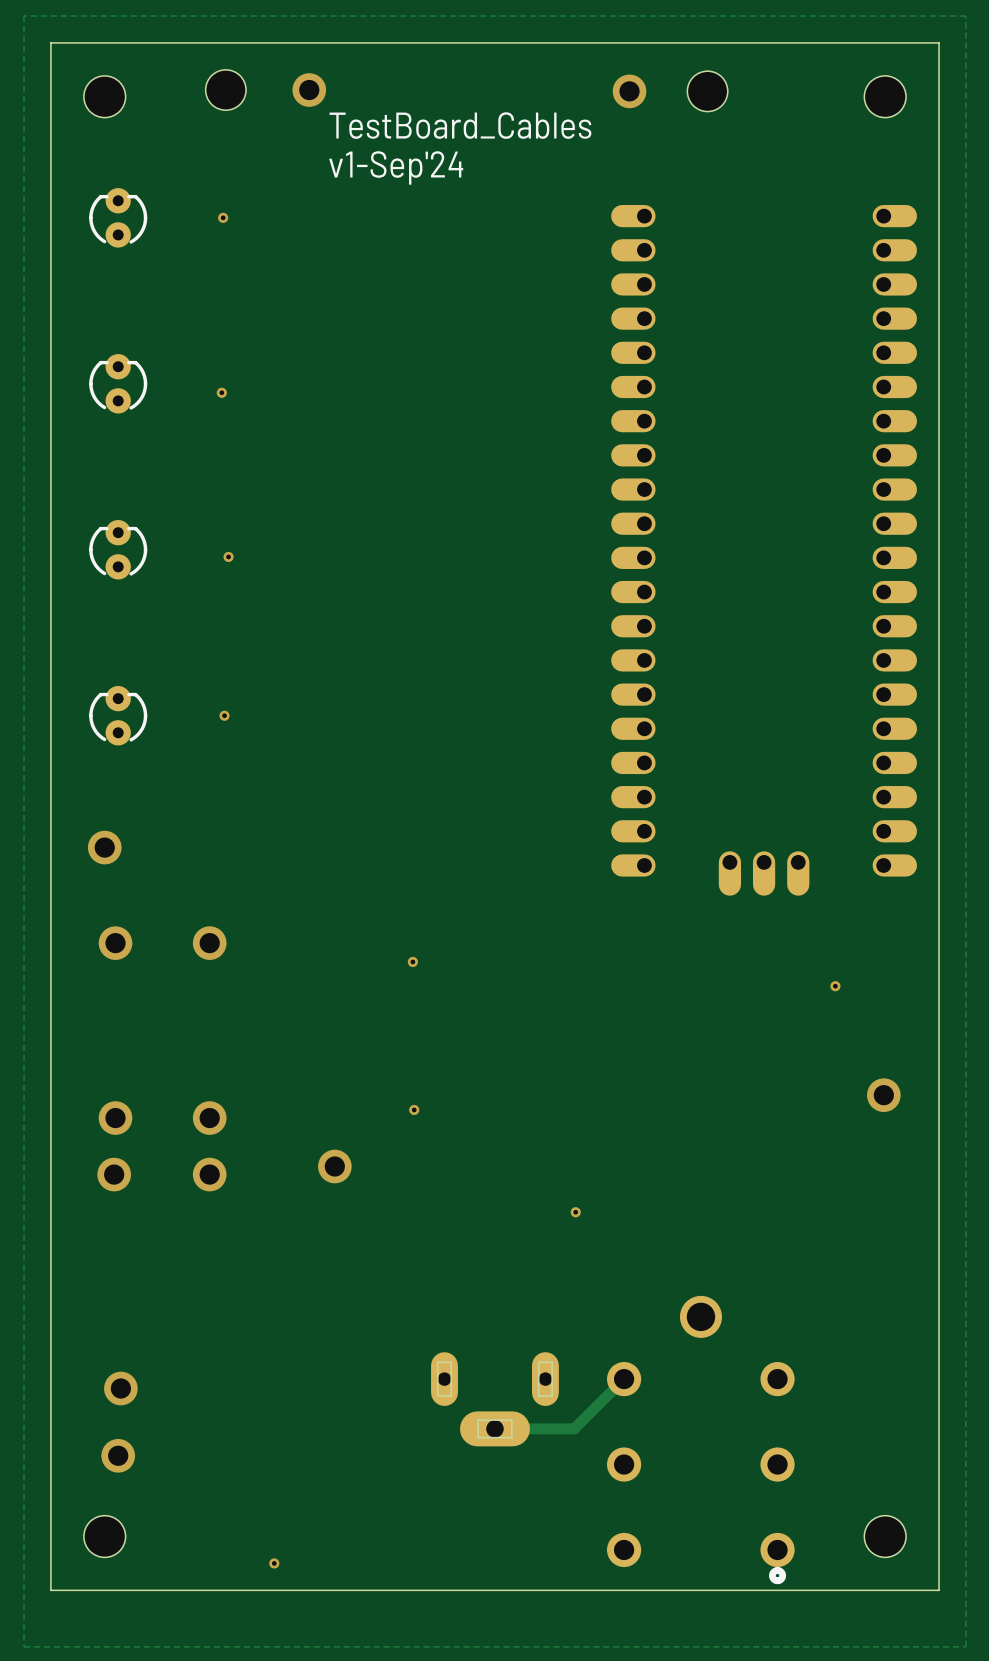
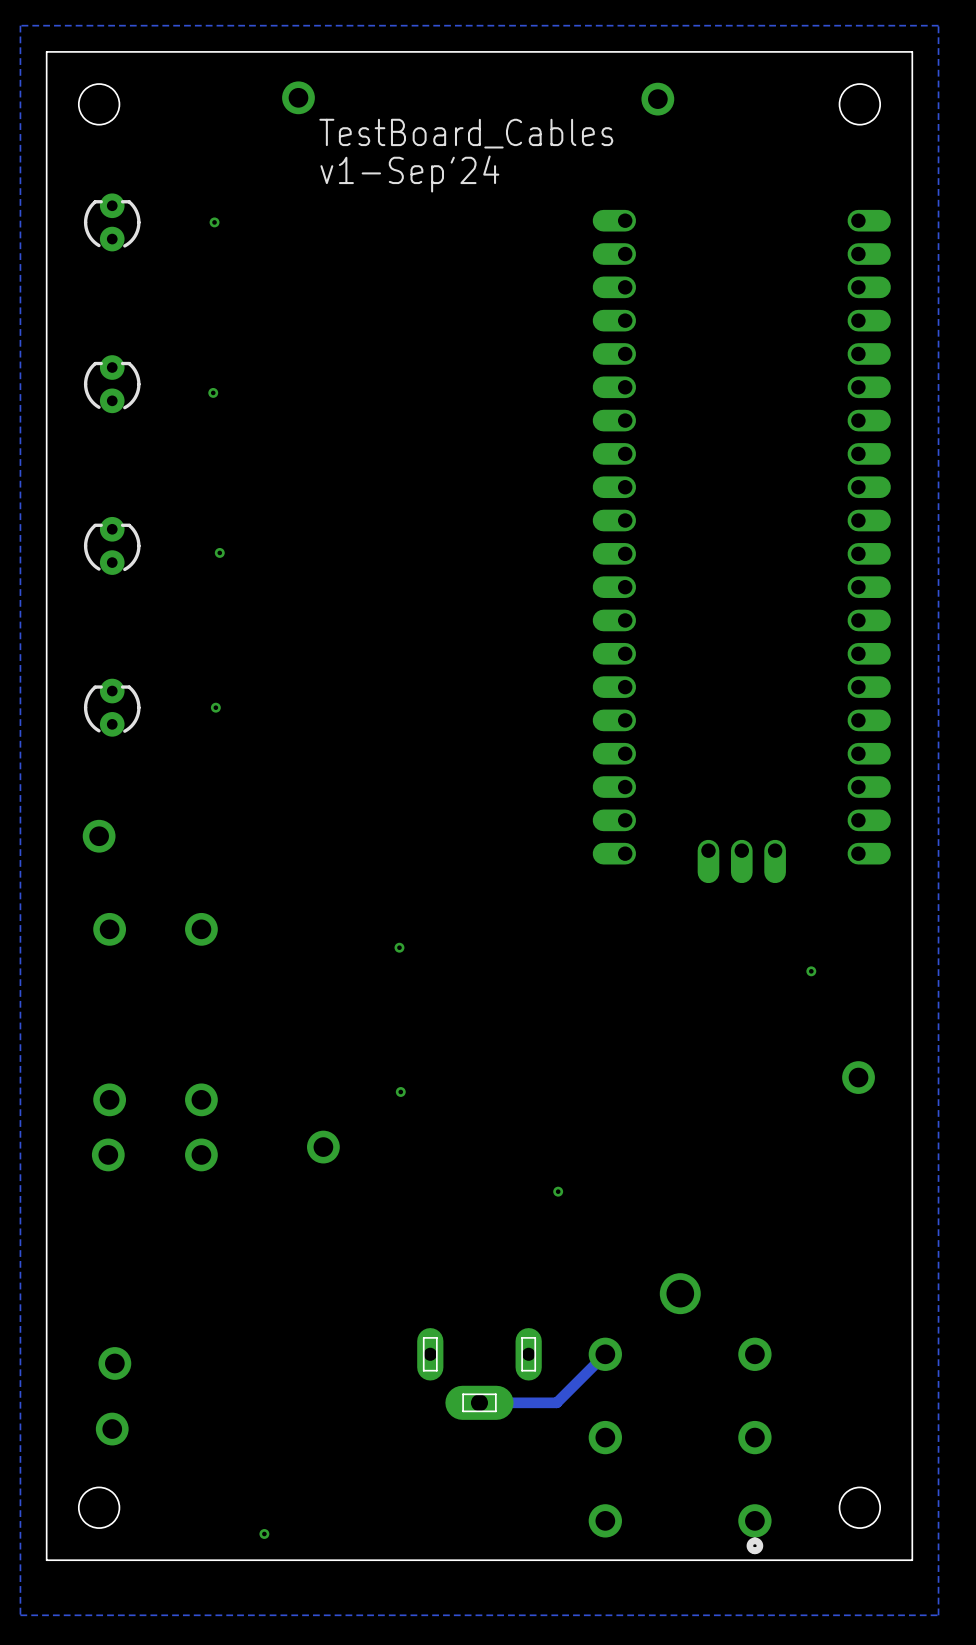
hole: (225, 90) -> none
via position: (629, 91) -> (657, 99)
hole: (707, 91) -> none

